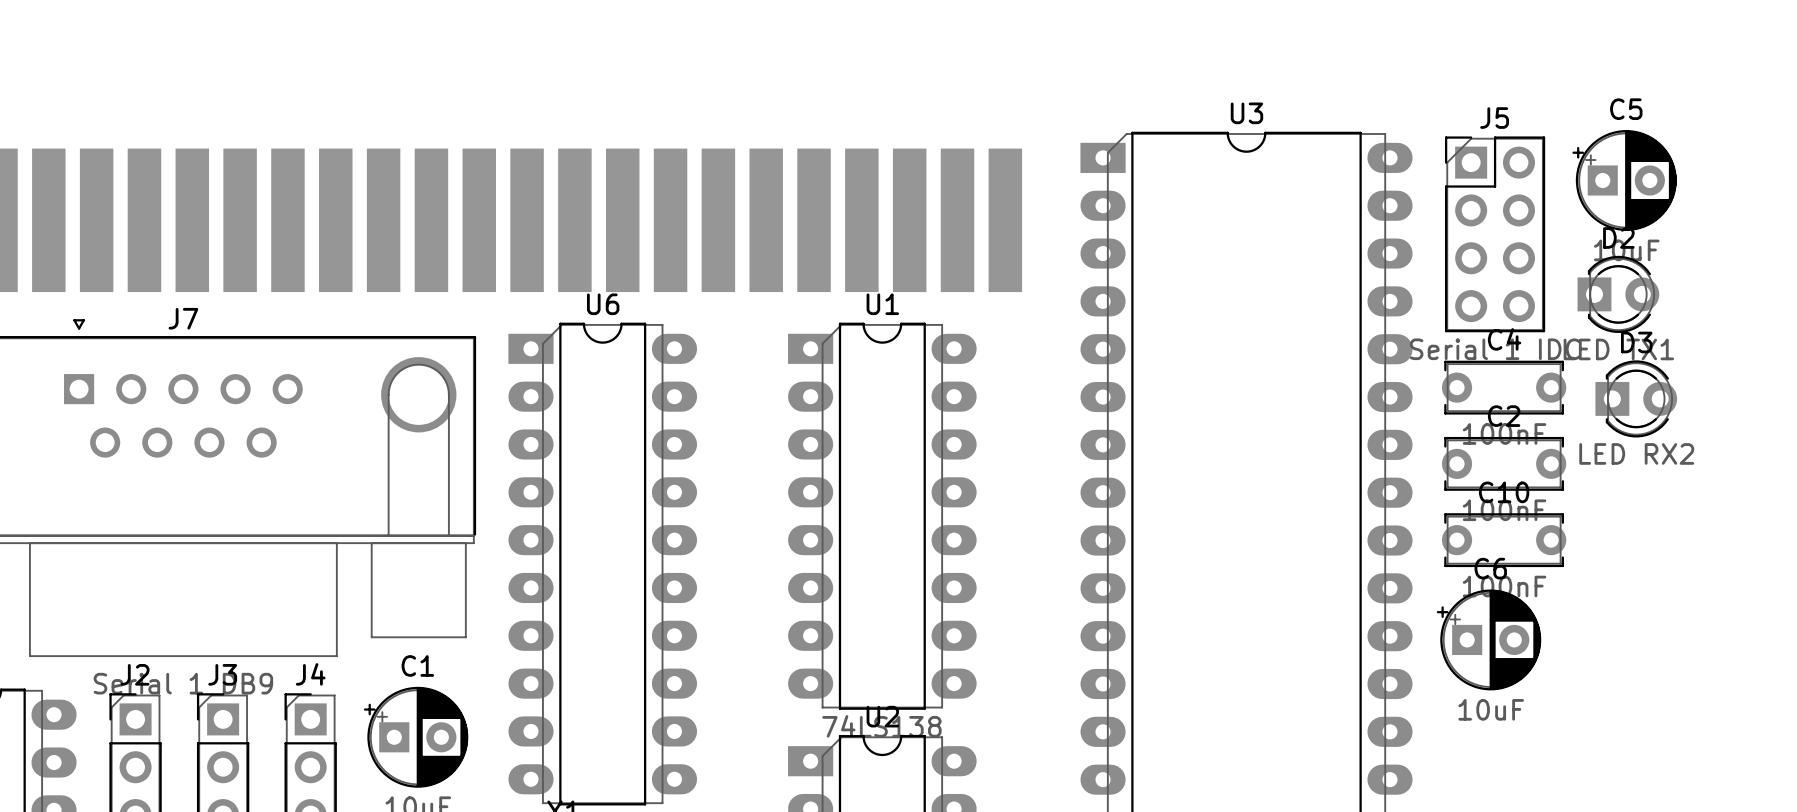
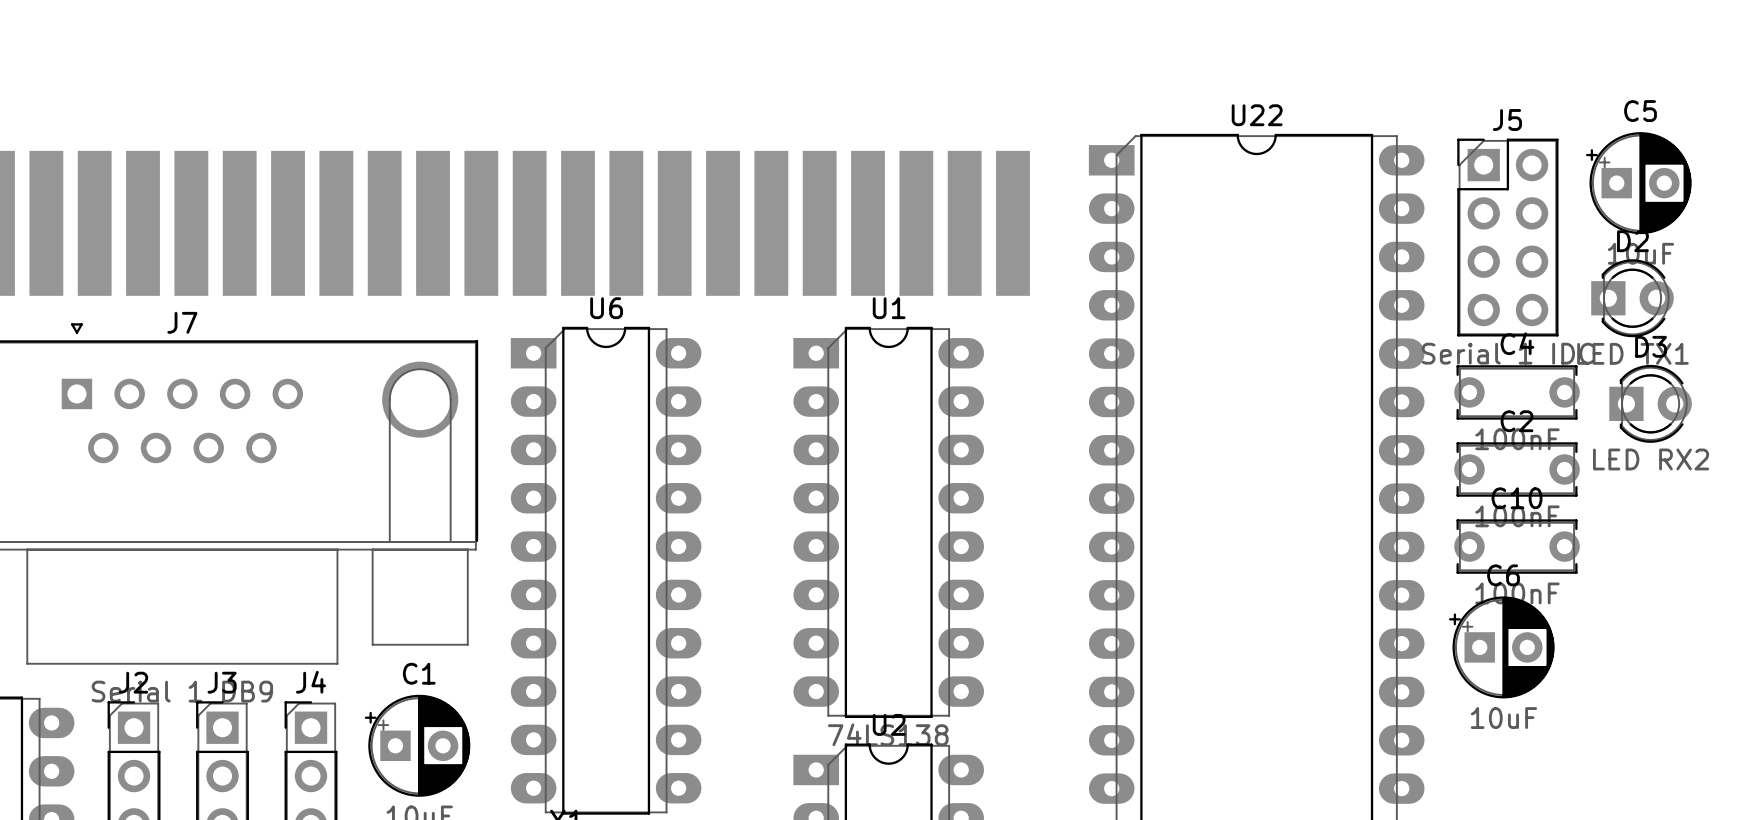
U3 name: U3 (1246, 113) -> U22 (1257, 115)

